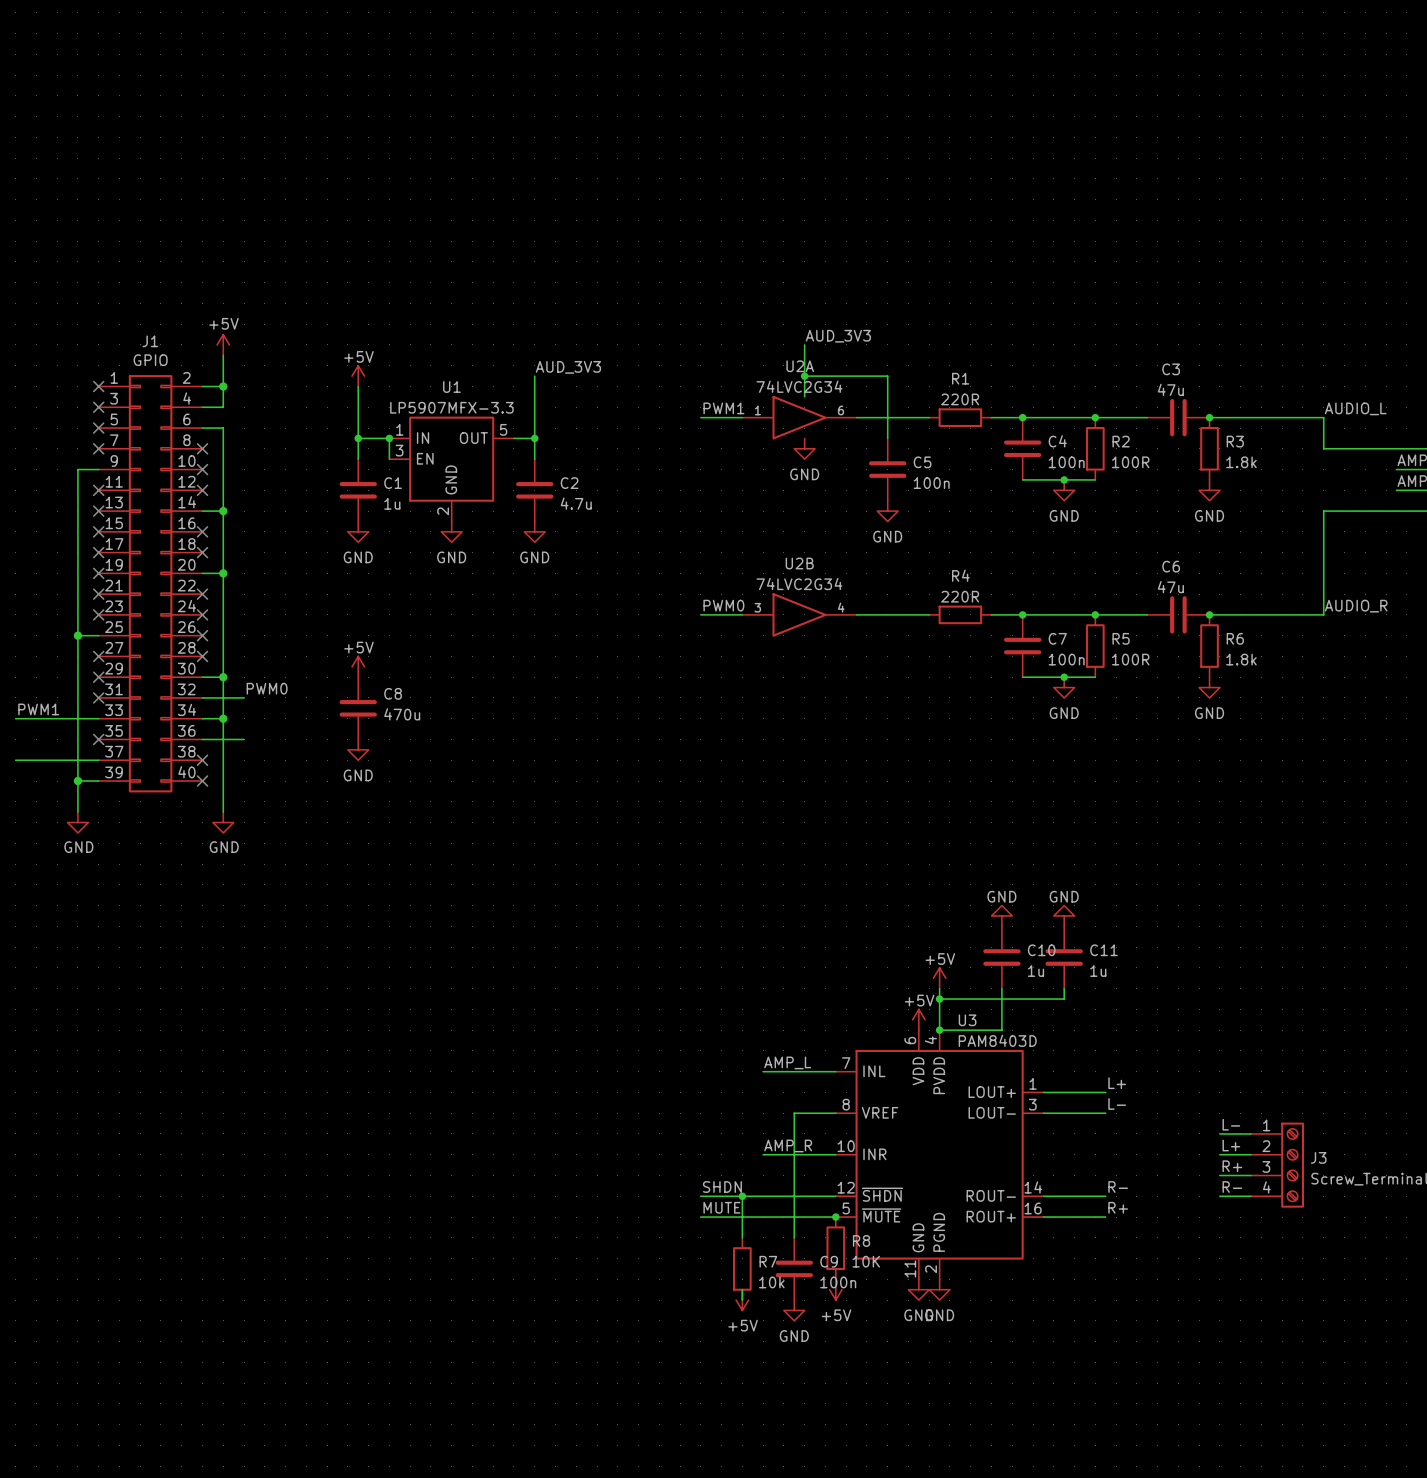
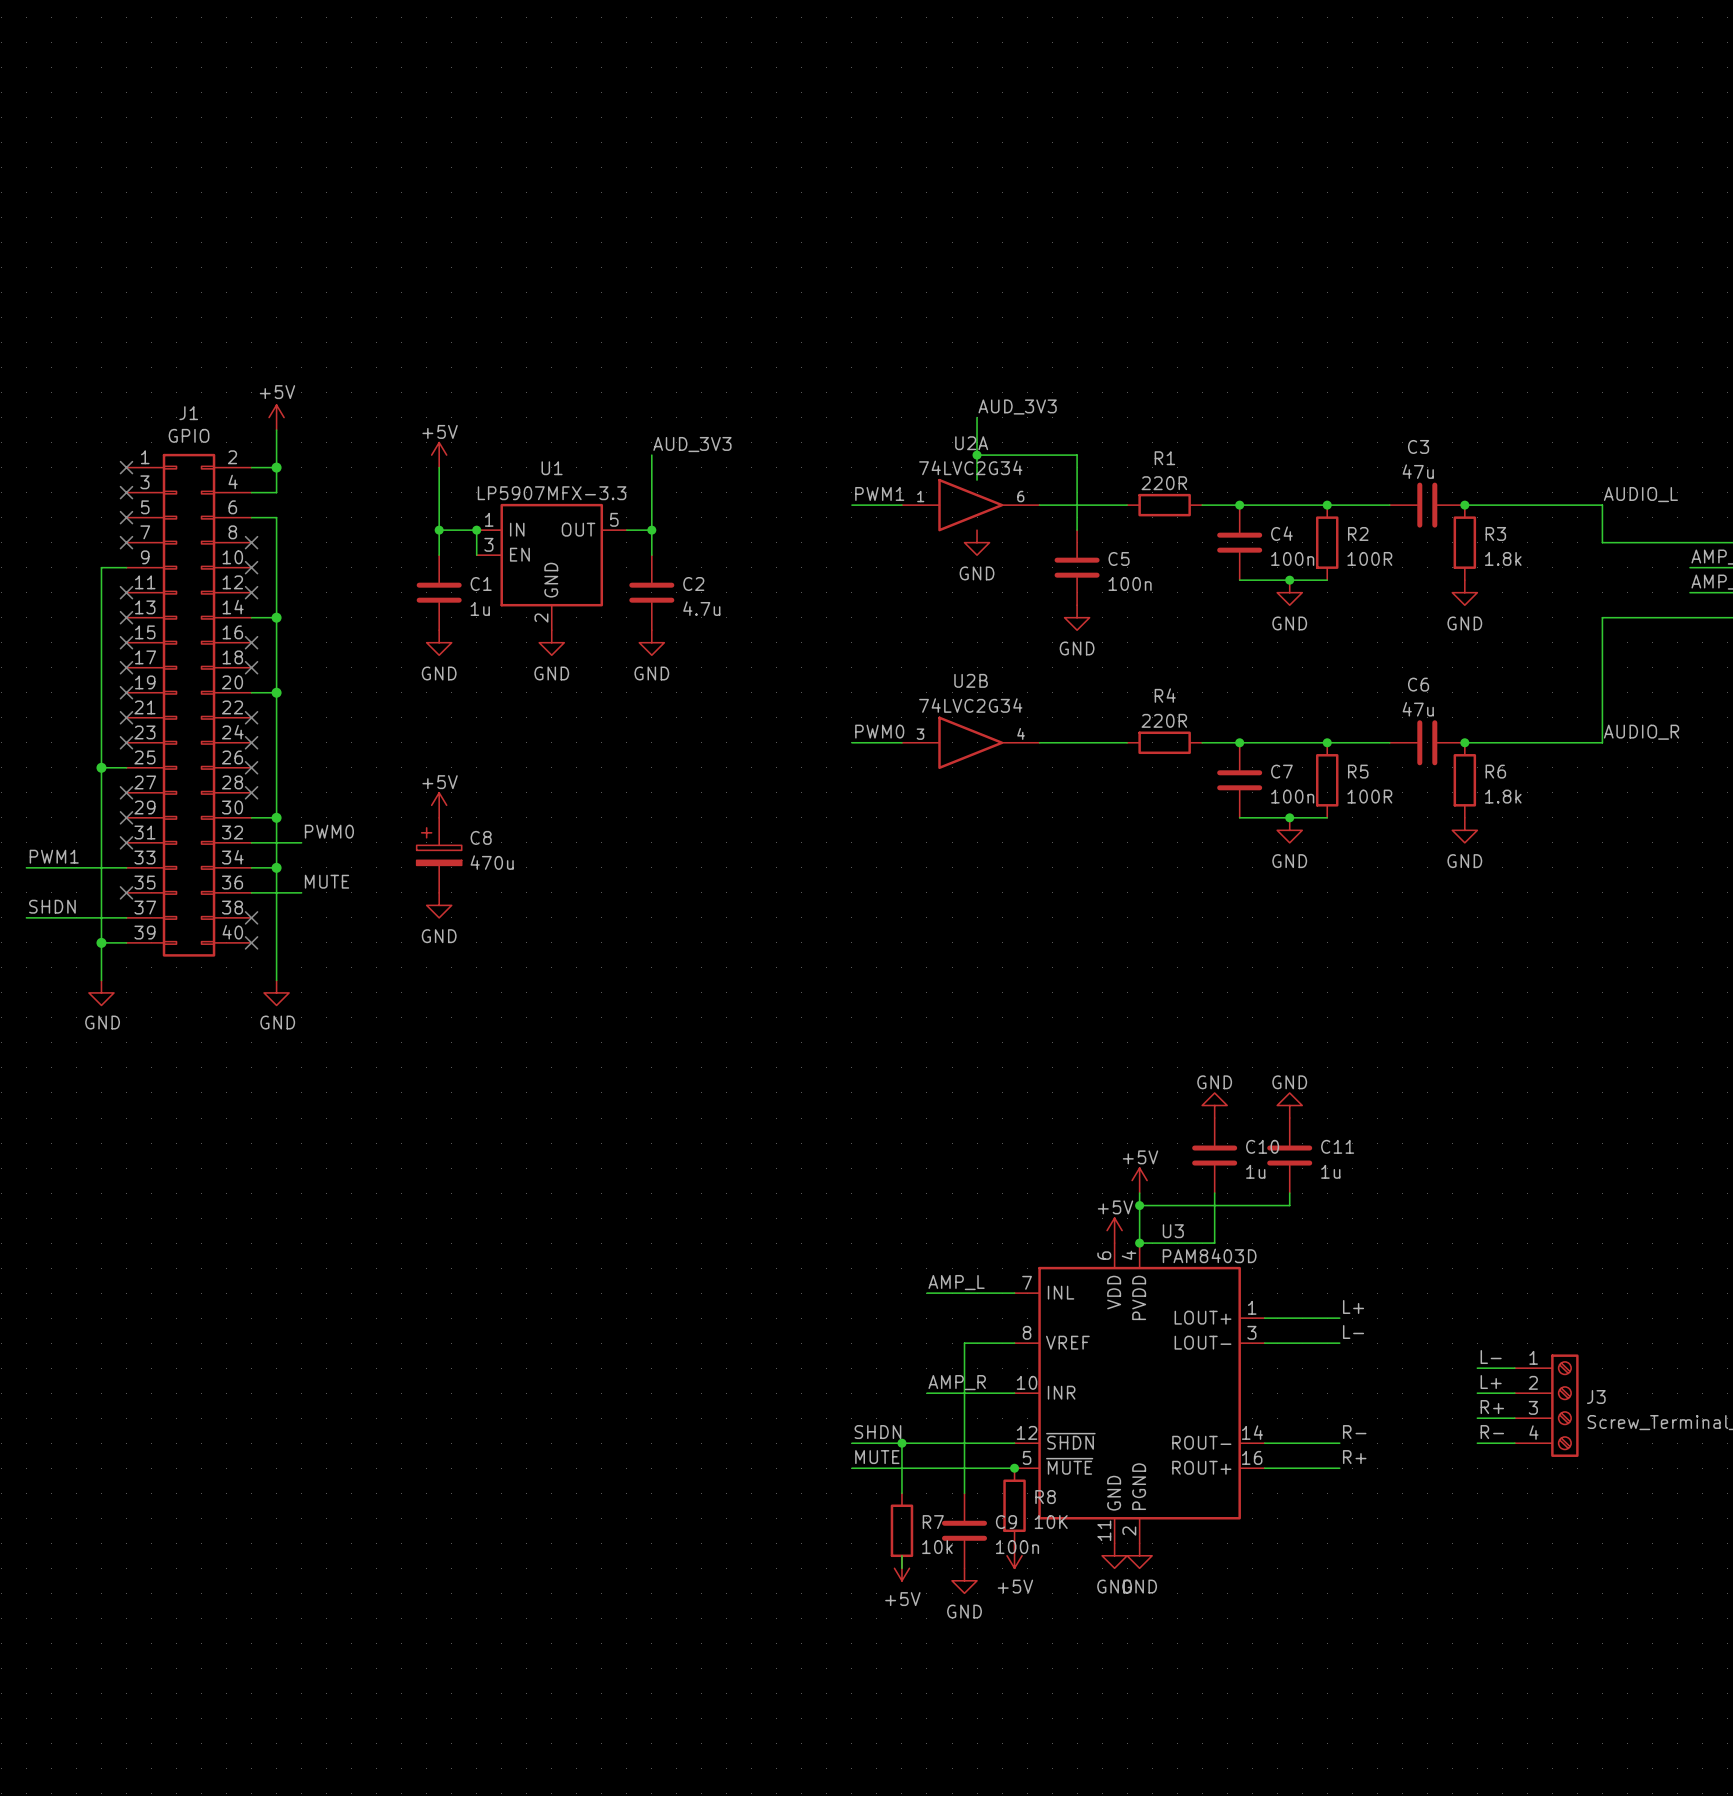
C8 symbol: [339, 677, 377, 740] -> [416, 817, 462, 893]
label: none -> MUTE (327, 881)
label: none -> SHDN (52, 906)

